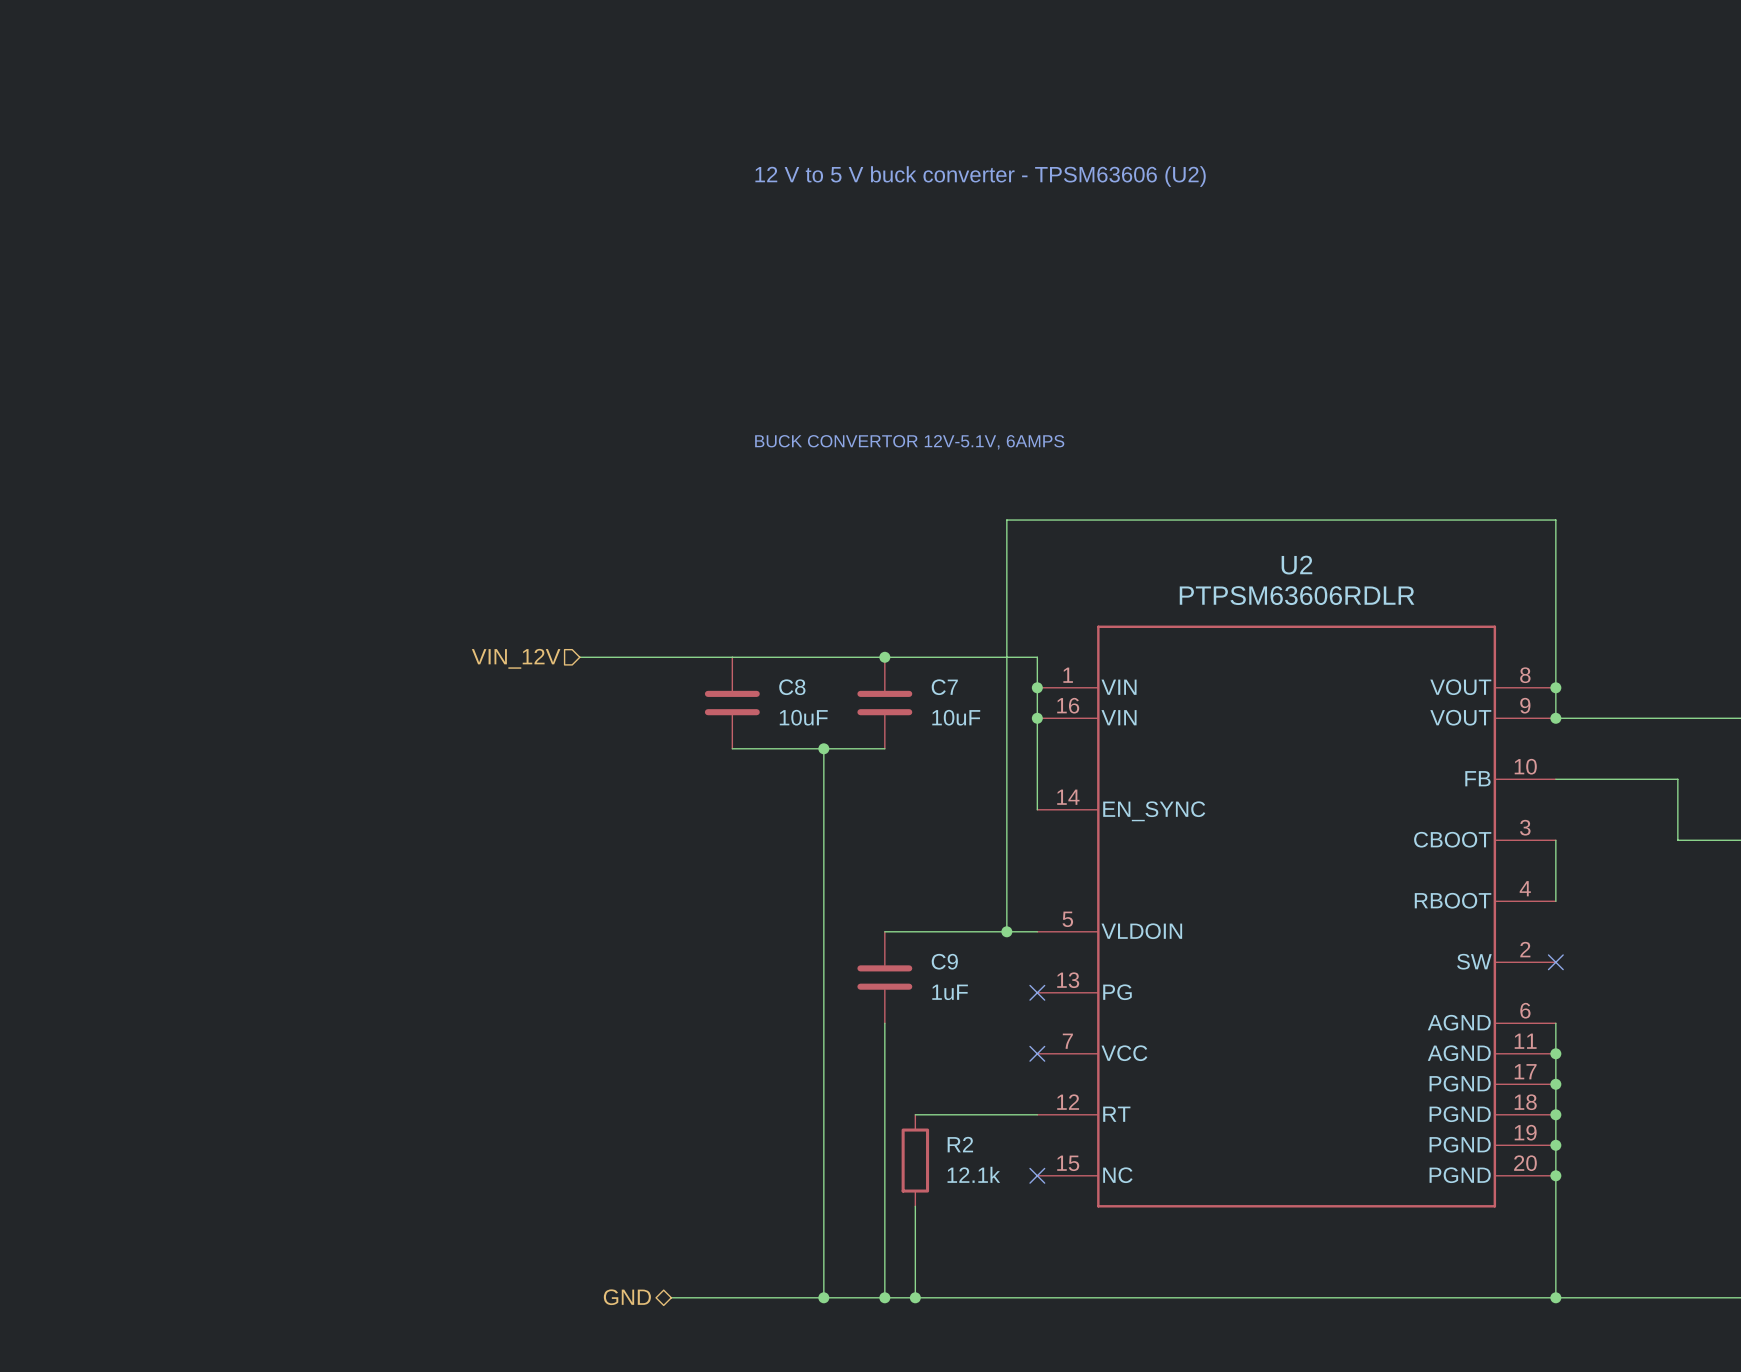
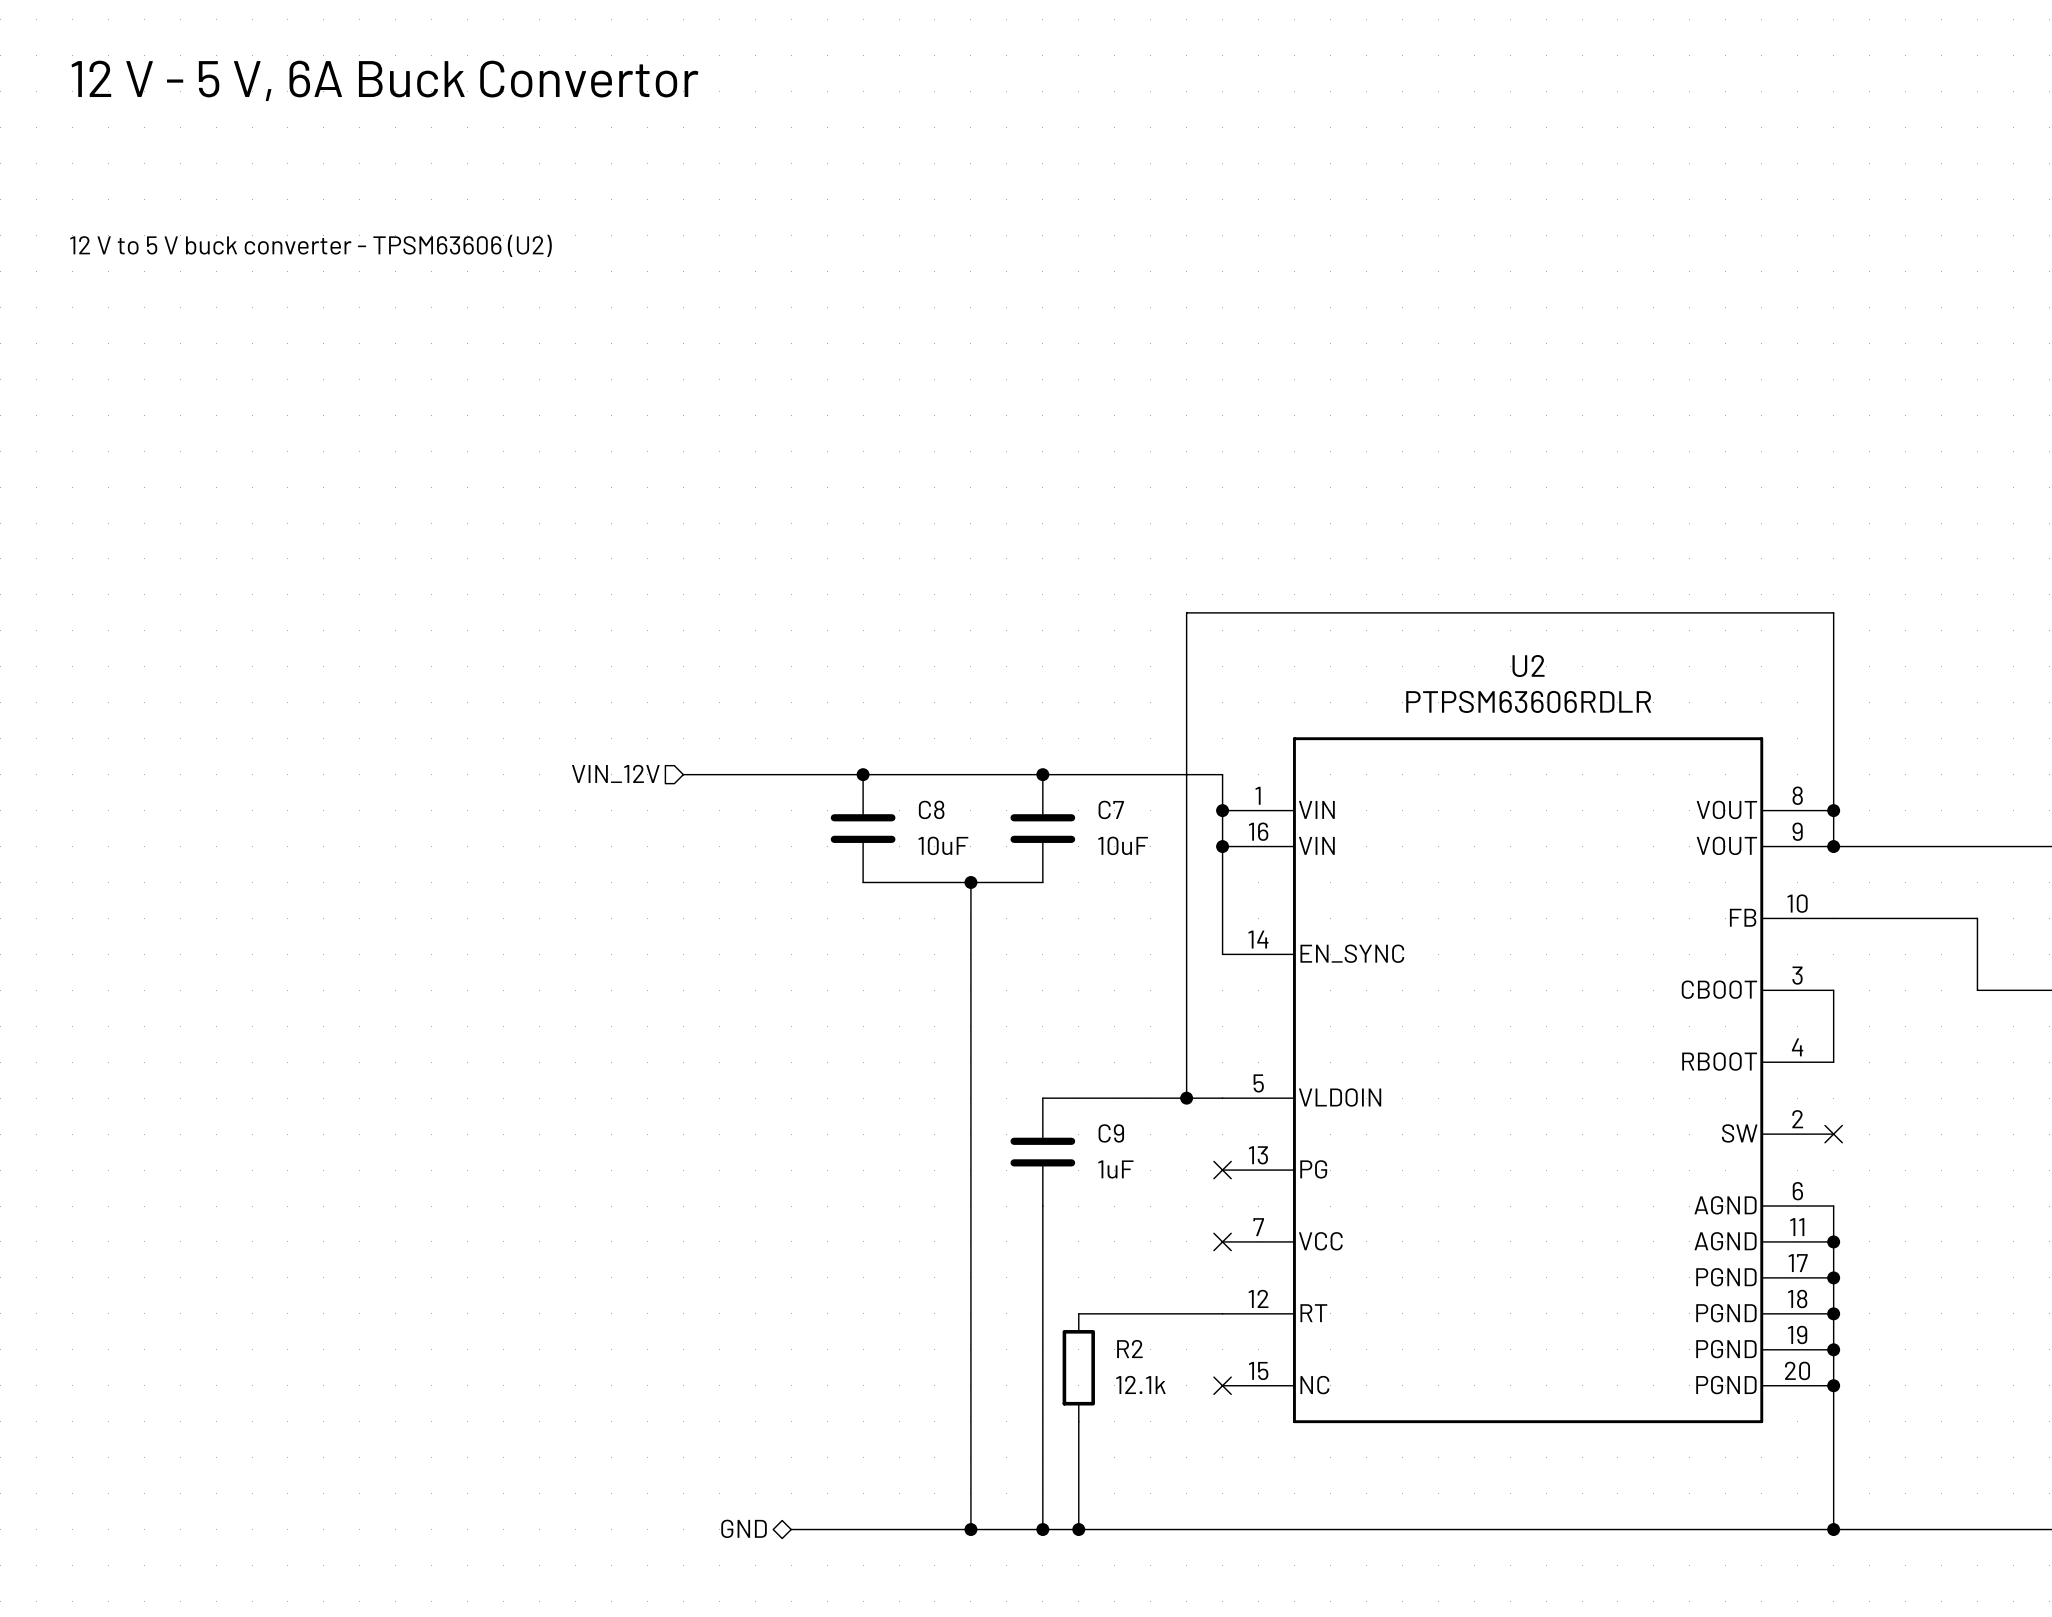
text: none -> 12 V - 5 V, 6A Buck Convertor (385, 80)
text: 12 V to 5 V buck converter - TPSM63606 (U2) (980, 176) -> none
text: none -> 12 V to 5 V buck converter - TPSM63606 (U2) (311, 245)
text: BUCK CONVERTOR 12V-5.1V, 6AMPS (909, 442) -> none
junction: none -> (863, 774)

